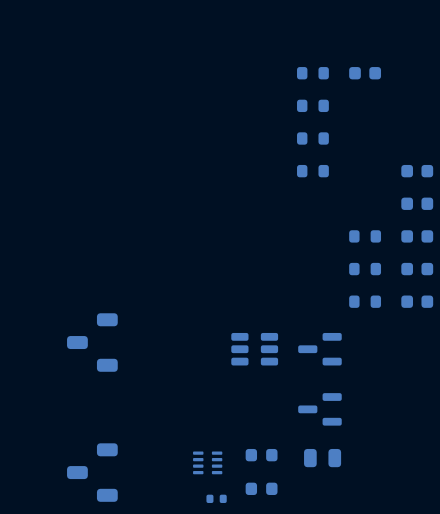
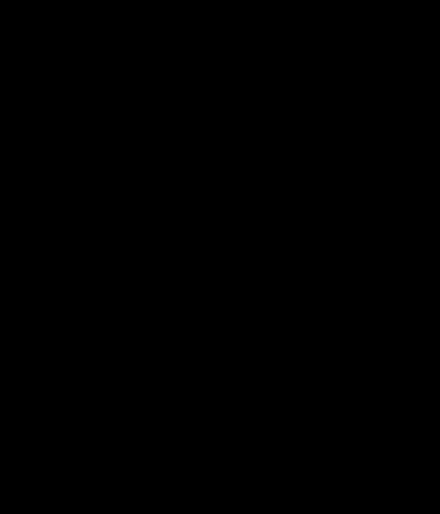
part: (312, 73) -> none
part: (365, 73) -> none
part: (312, 105) -> none
part: (312, 138) -> none
part: (312, 171) -> none
part: (417, 171) -> none
part: (417, 203) -> none
part: (365, 236) -> none
part: (417, 236) -> none
part: (365, 269) -> none
part: (417, 269) -> none
part: (365, 301) -> none
part: (417, 301) -> none
part: (92, 342) -> none
part: (254, 349) -> none
part: (319, 349) -> none
part: (319, 409) -> none
part: (261, 455) -> none
part: (322, 458) -> none
part: (207, 462) -> none
part: (92, 472) -> none
part: (261, 488) -> none
part: (216, 498) -> none

